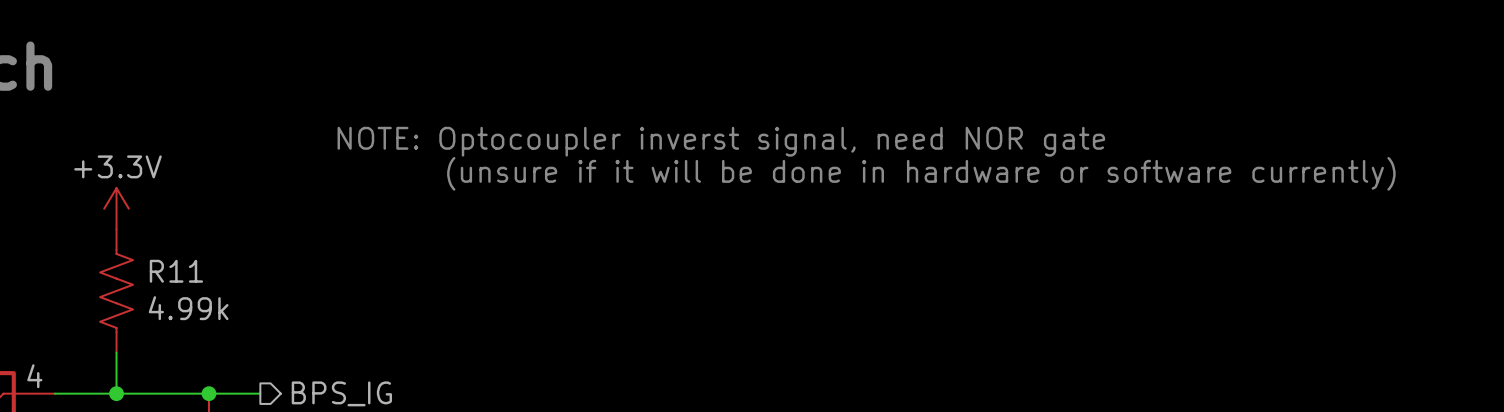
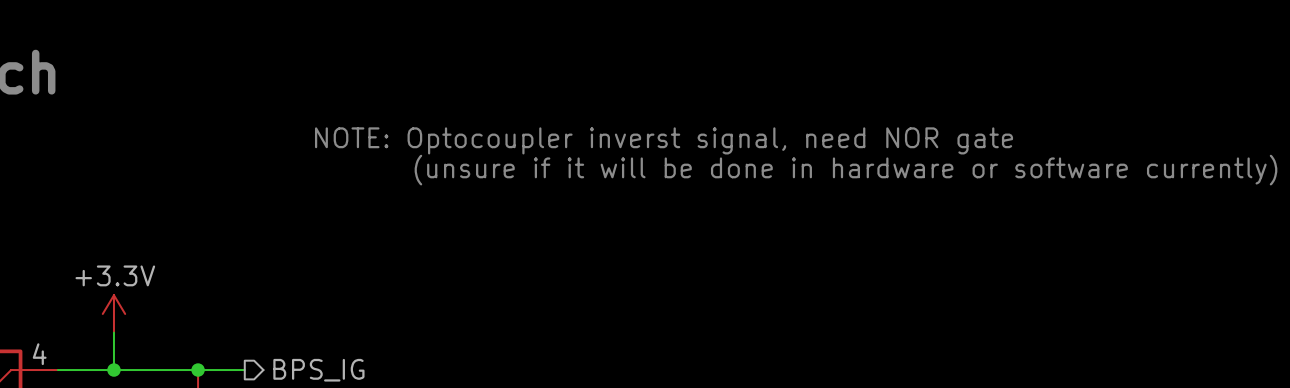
power symbol position: +3.3V (116, 208) -> +3.3V (113, 313)
R11: 4.99k (116, 290) -> none

